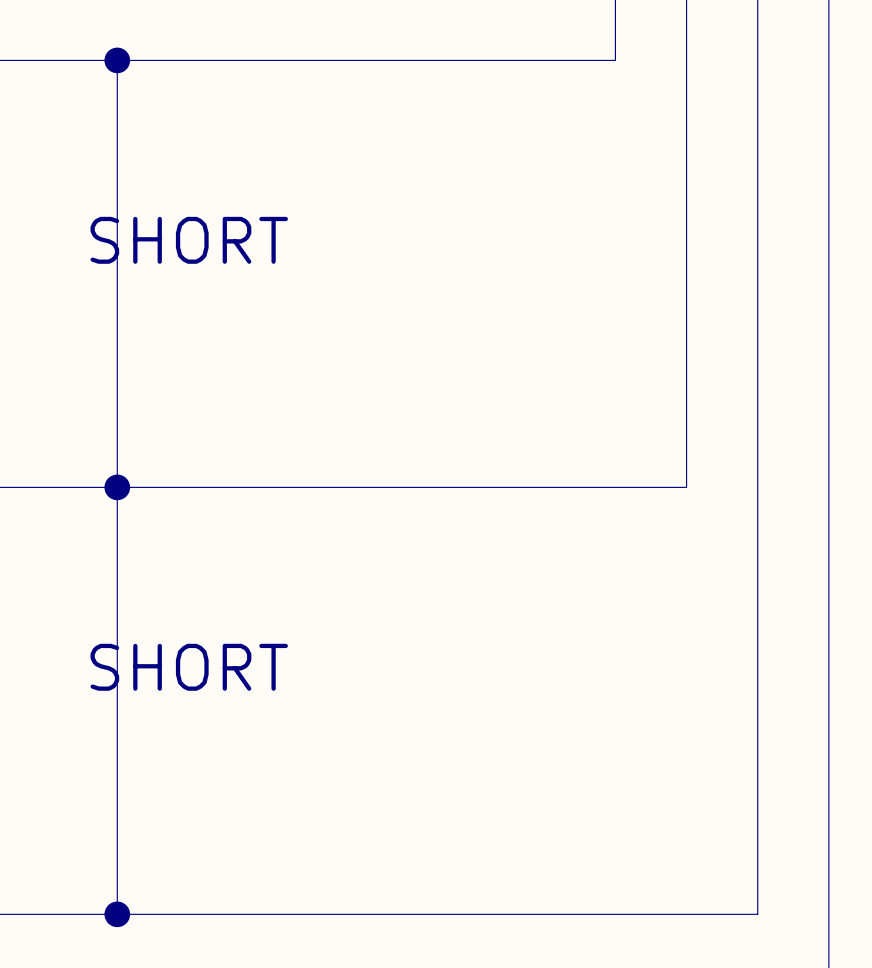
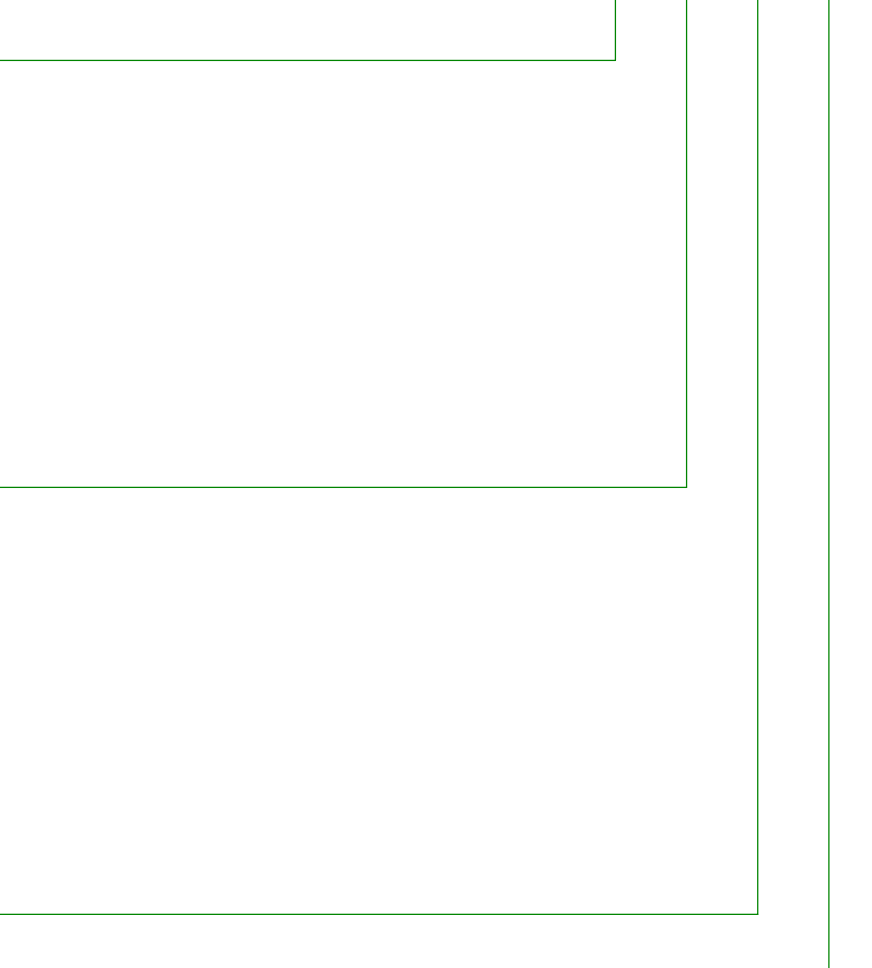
wire: (117, 60) (117, 914) -> none
junction: (117, 60) -> none
text: SHORT (189, 240) -> none
junction: (117, 487) -> none
text: SHORT (189, 667) -> none
junction: (117, 914) -> none

